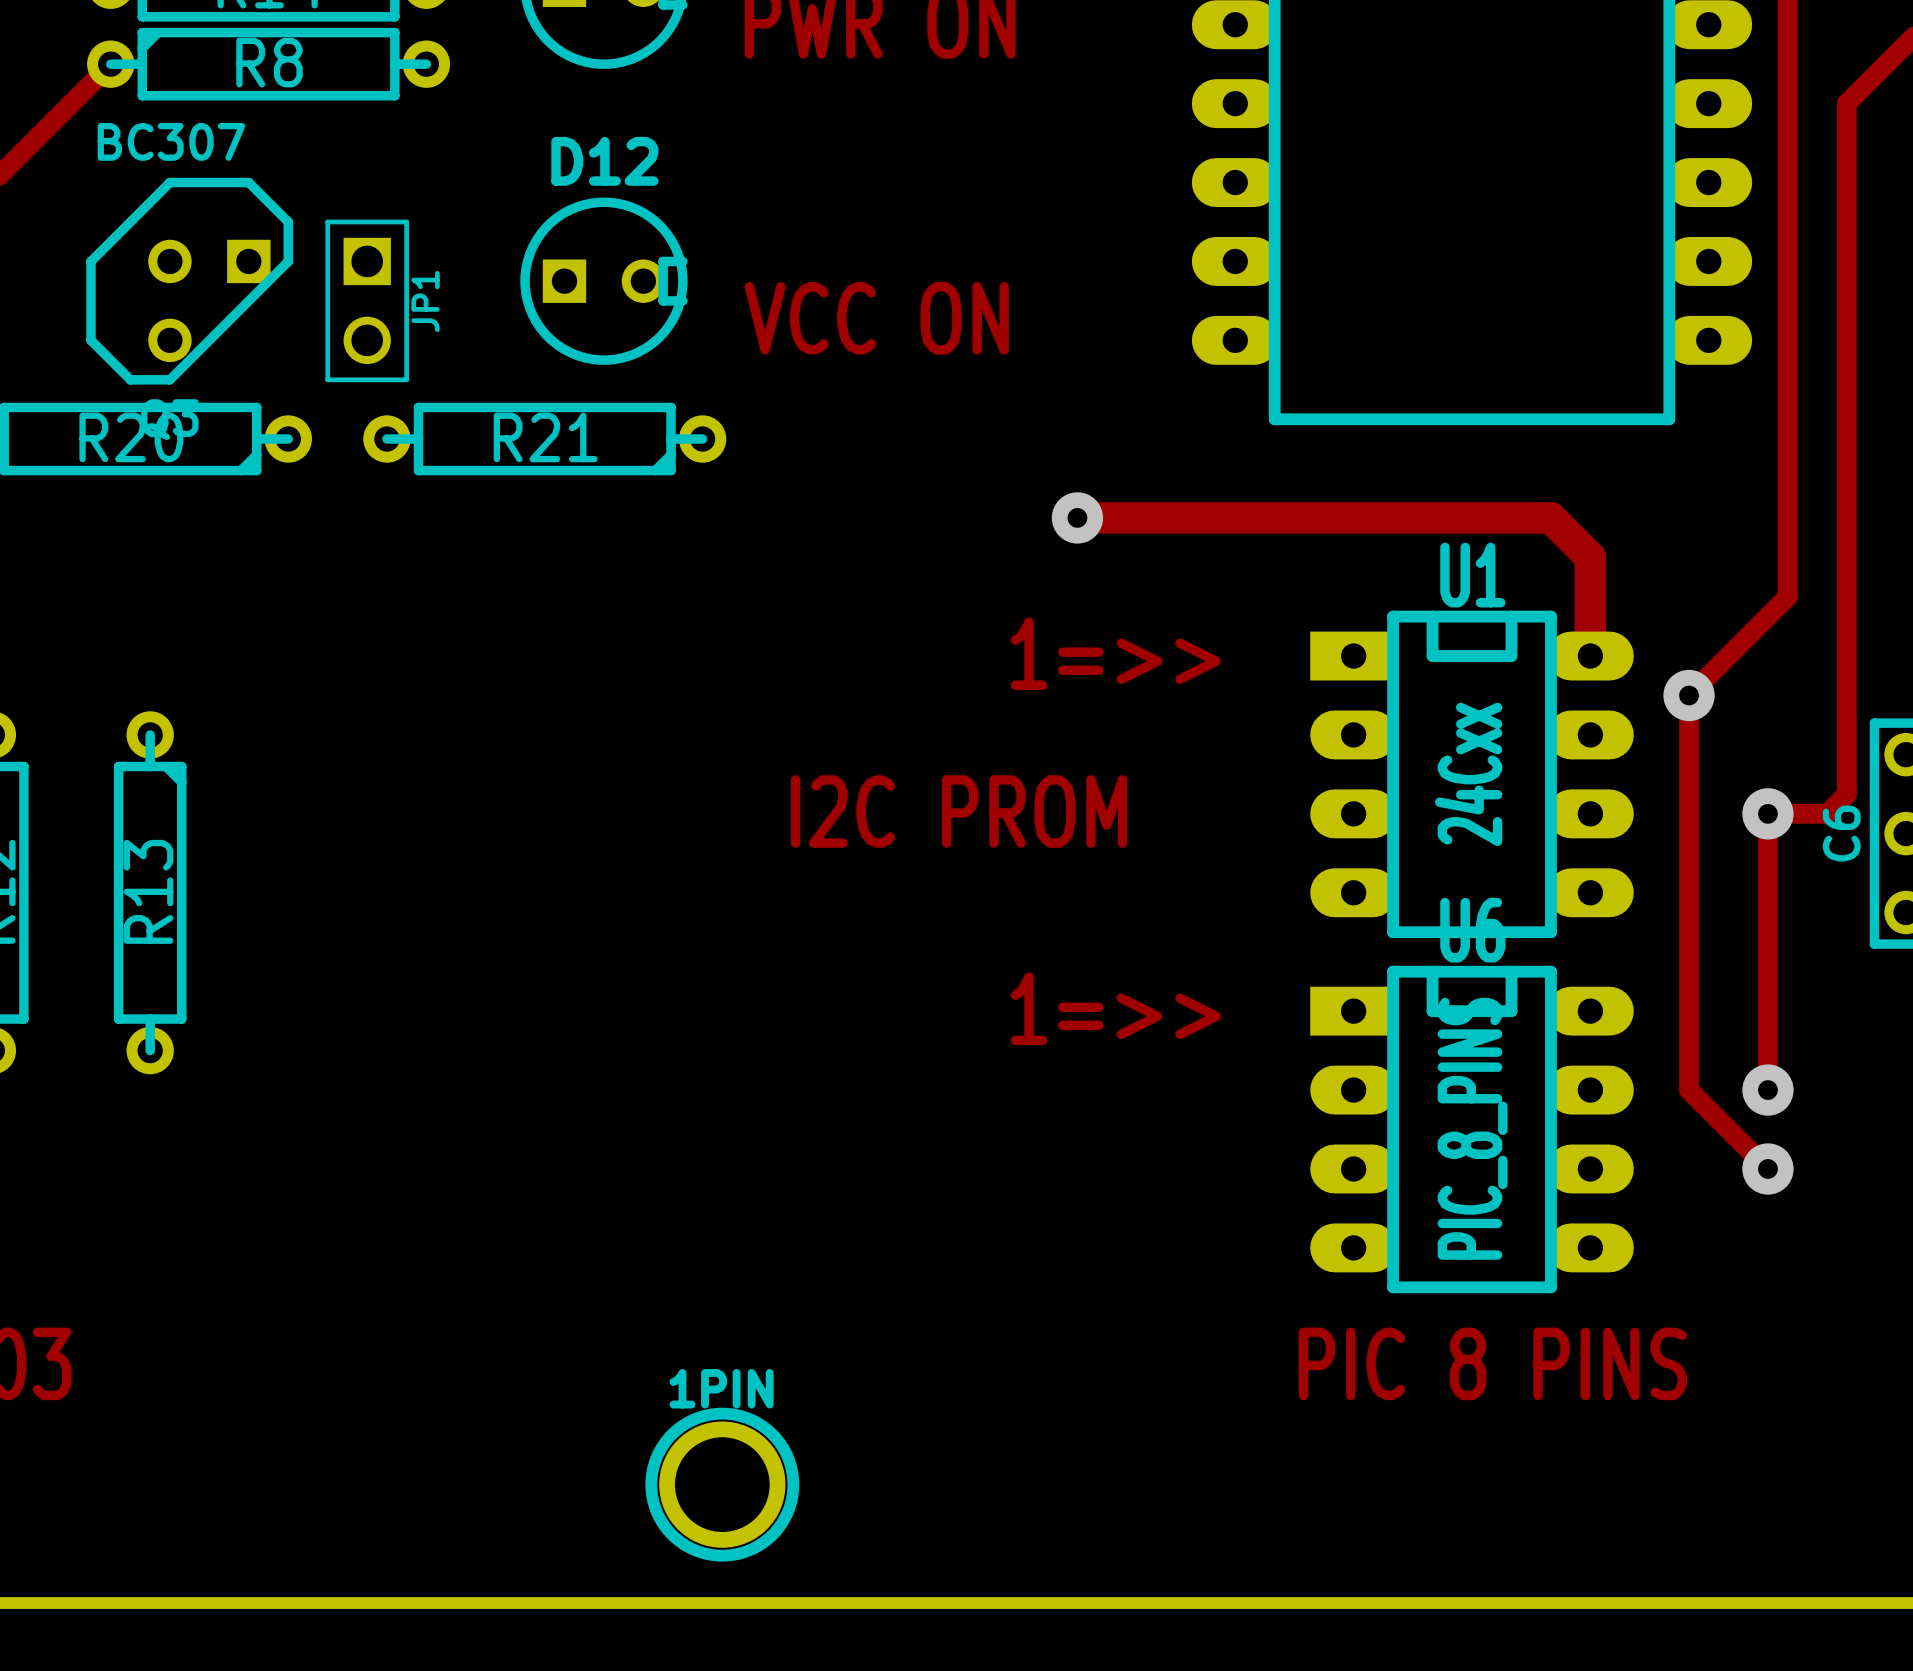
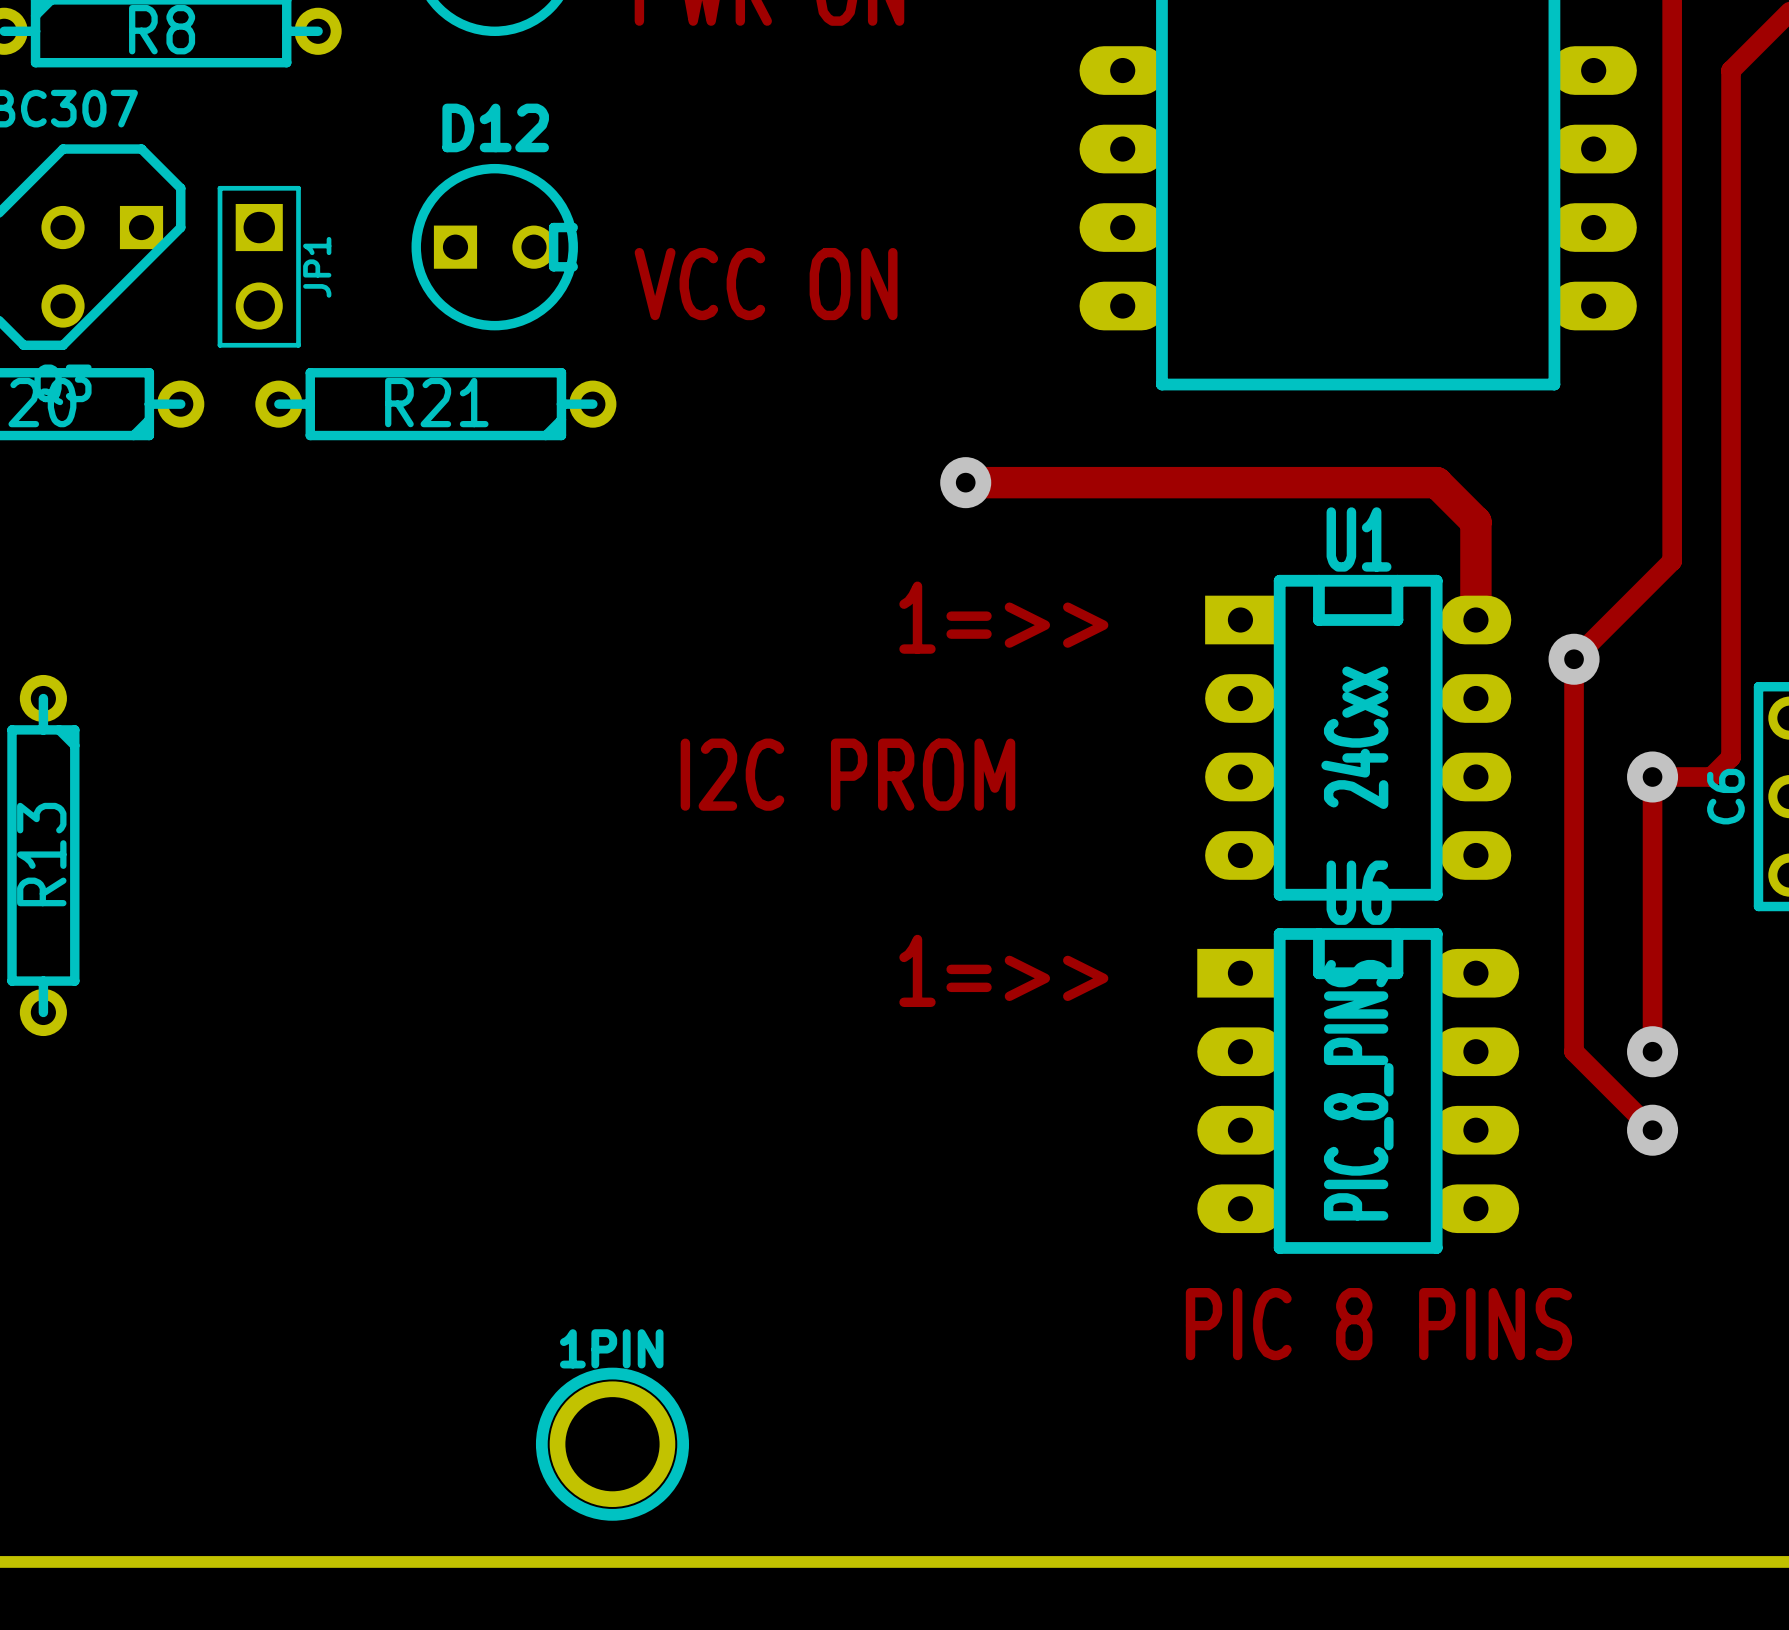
U1 footprint: [1310, 610, 1634, 939] -> [1205, 574, 1512, 901]

